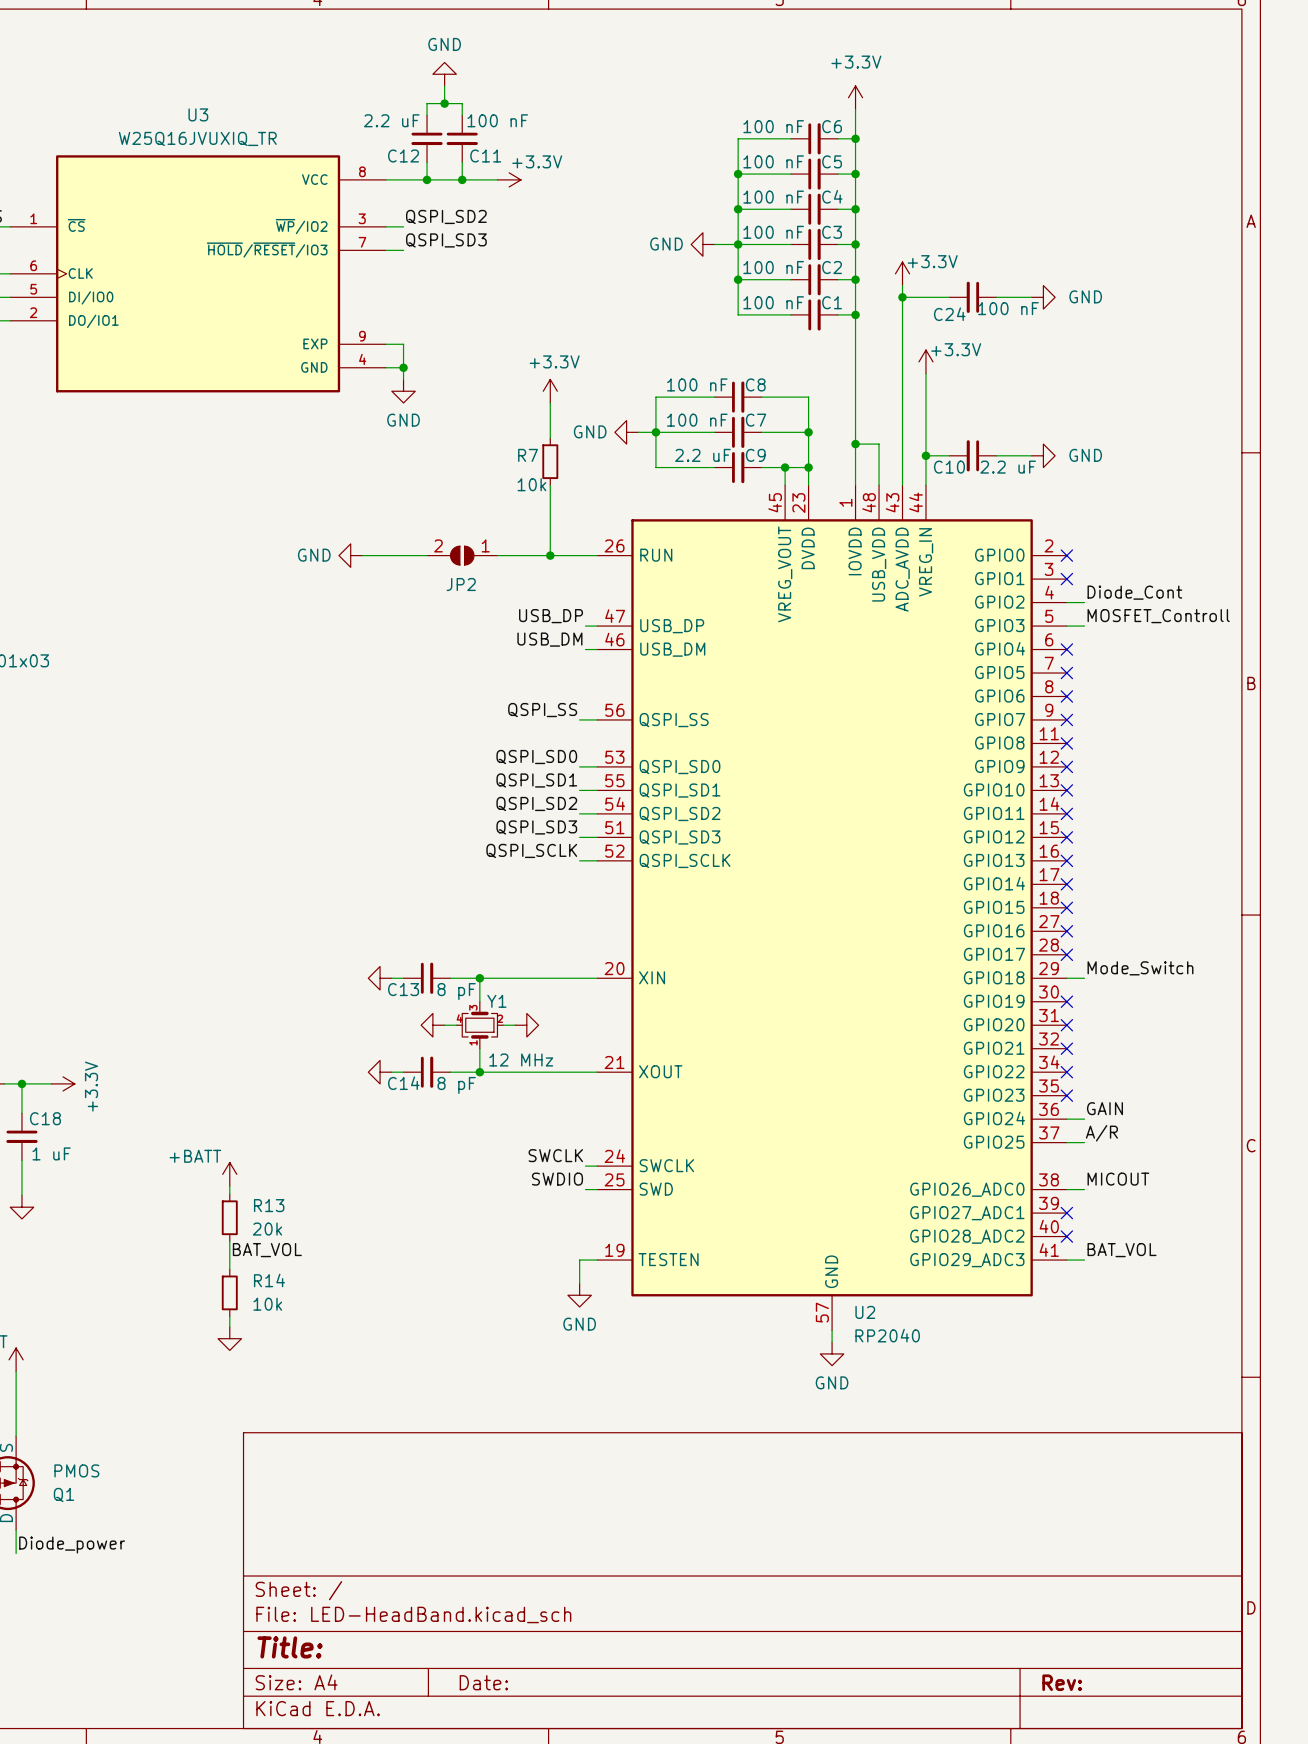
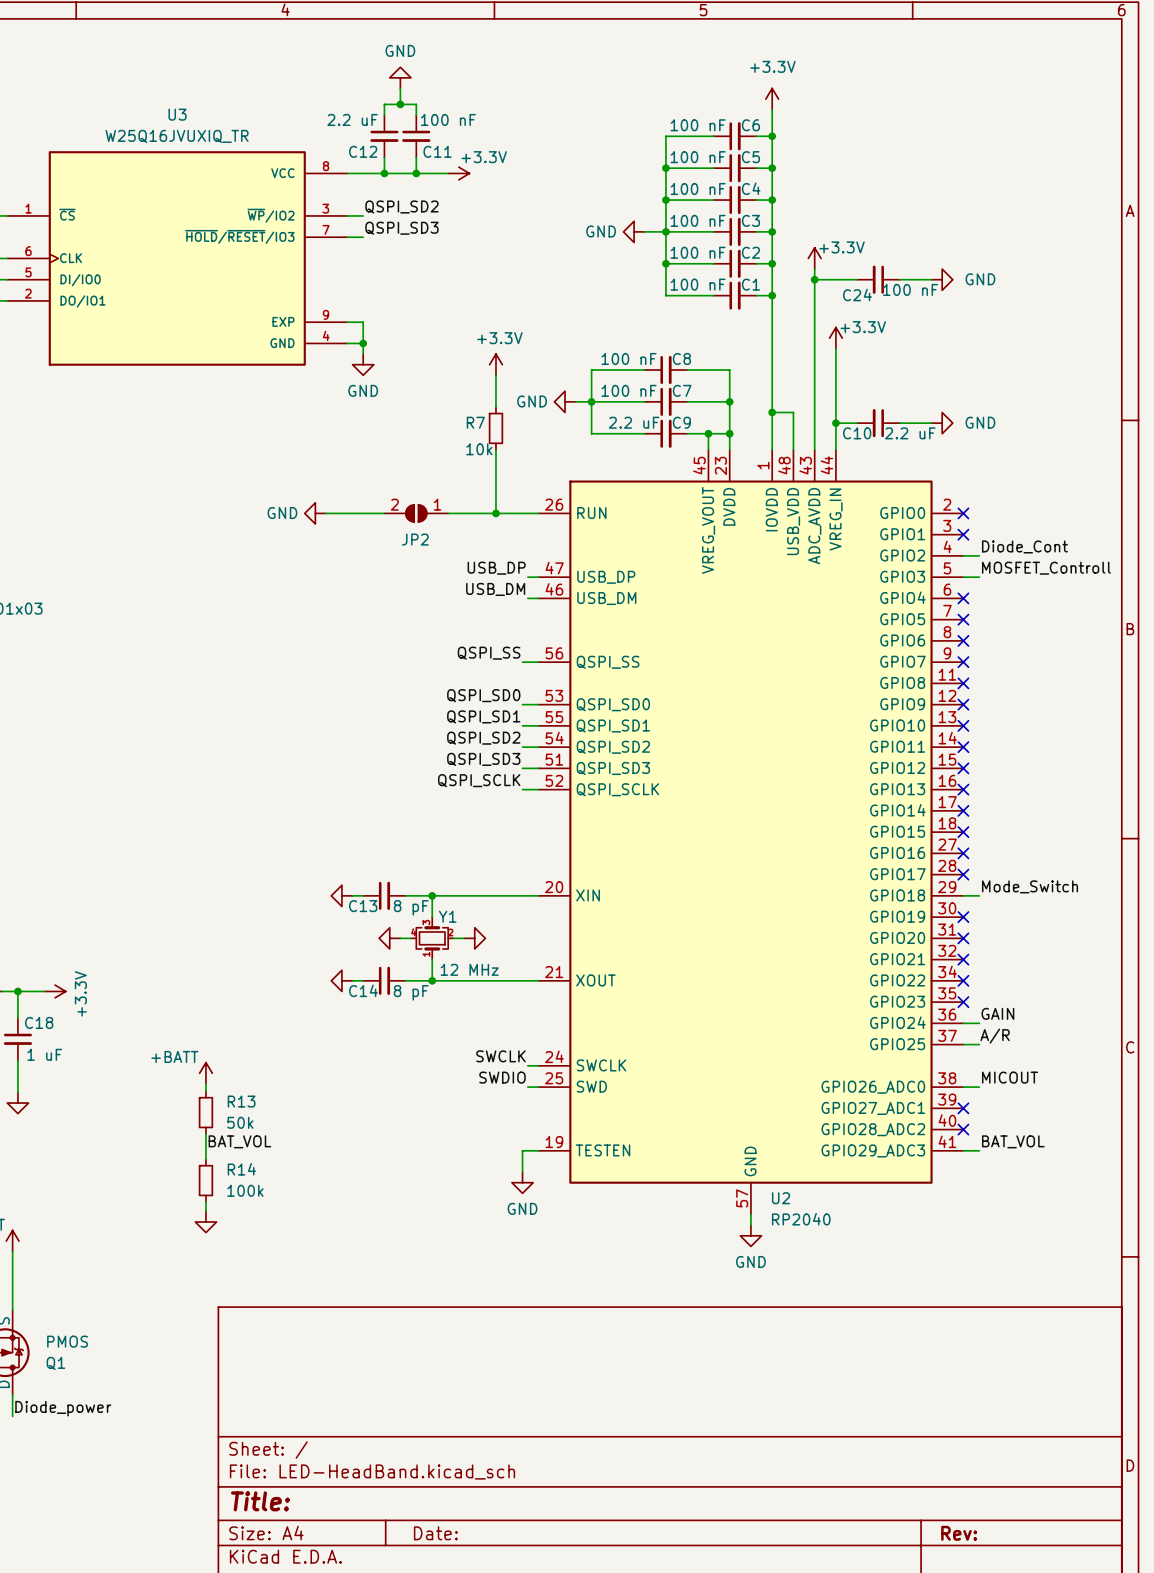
R13 value: 20k (267, 1229) -> 50k (240, 1122)
R14 value: 10k (267, 1304) -> 100k (245, 1190)

